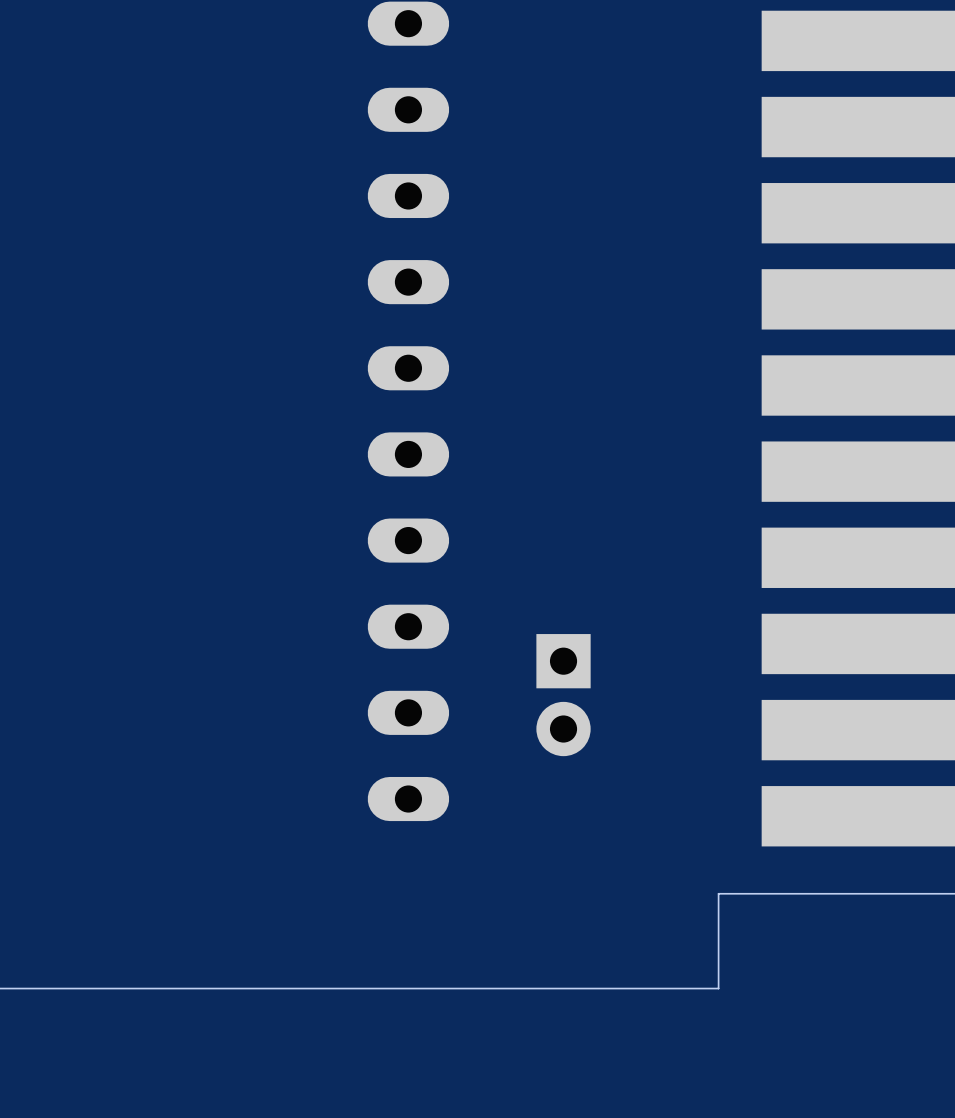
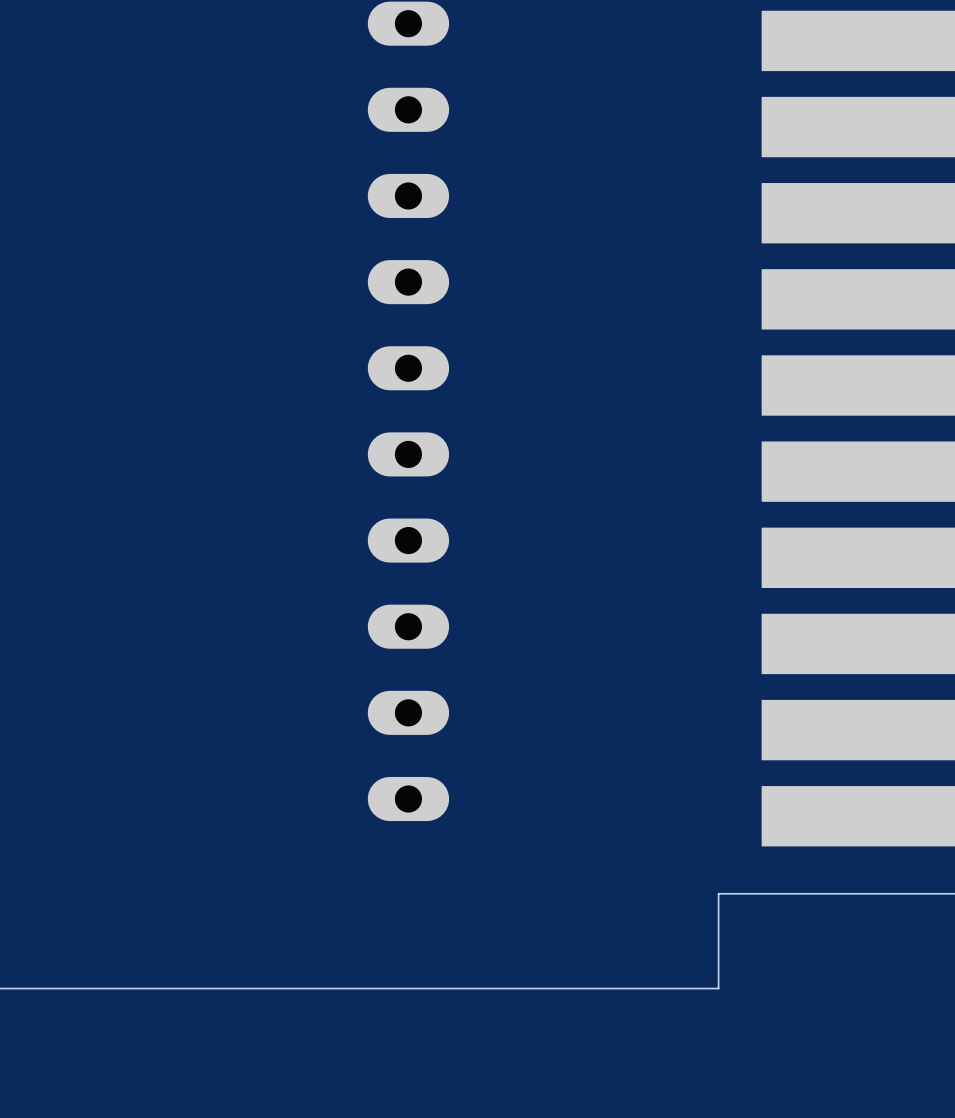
part: (563, 695) -> none

